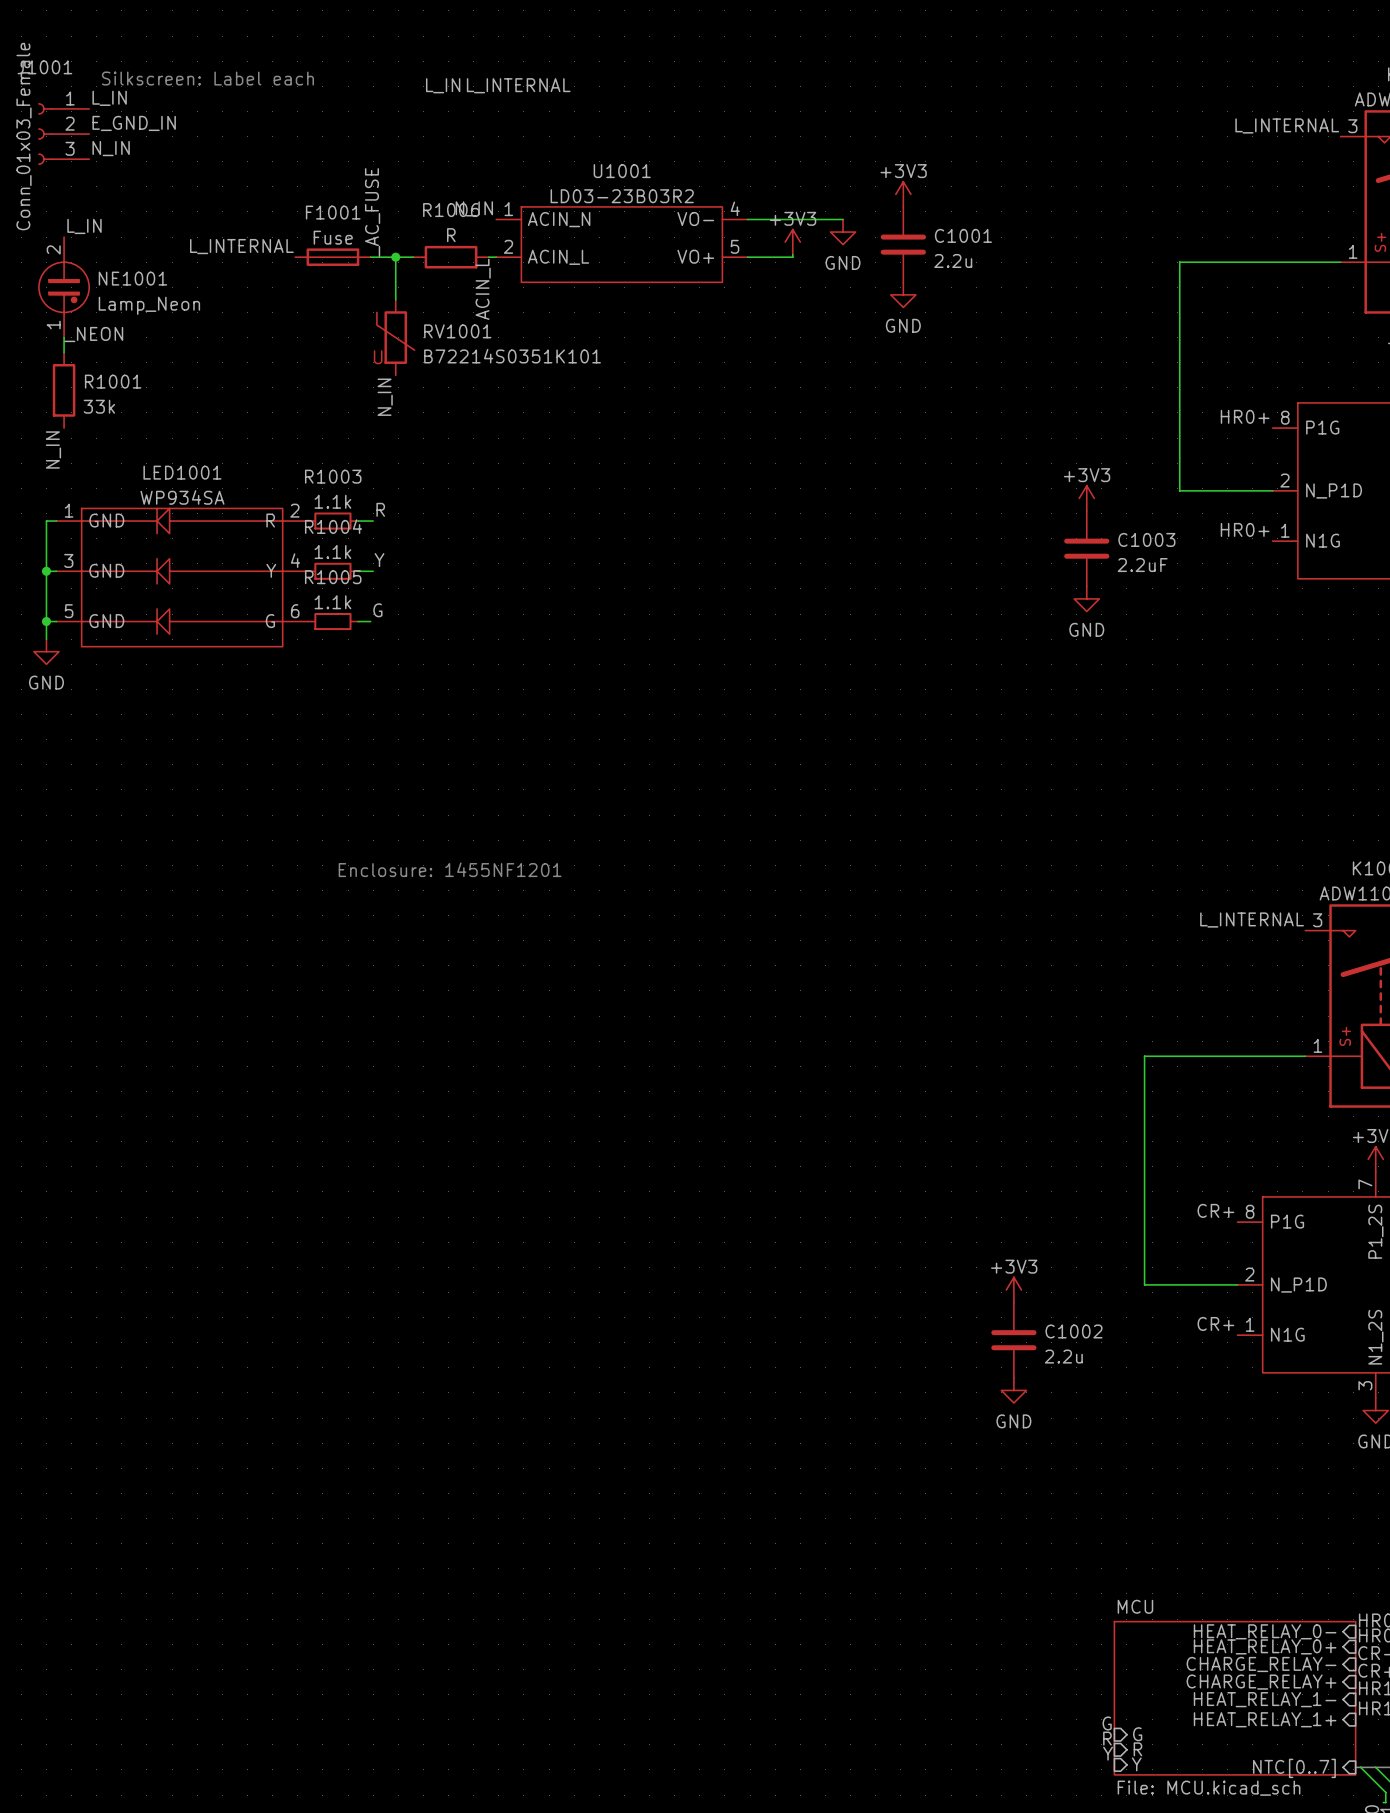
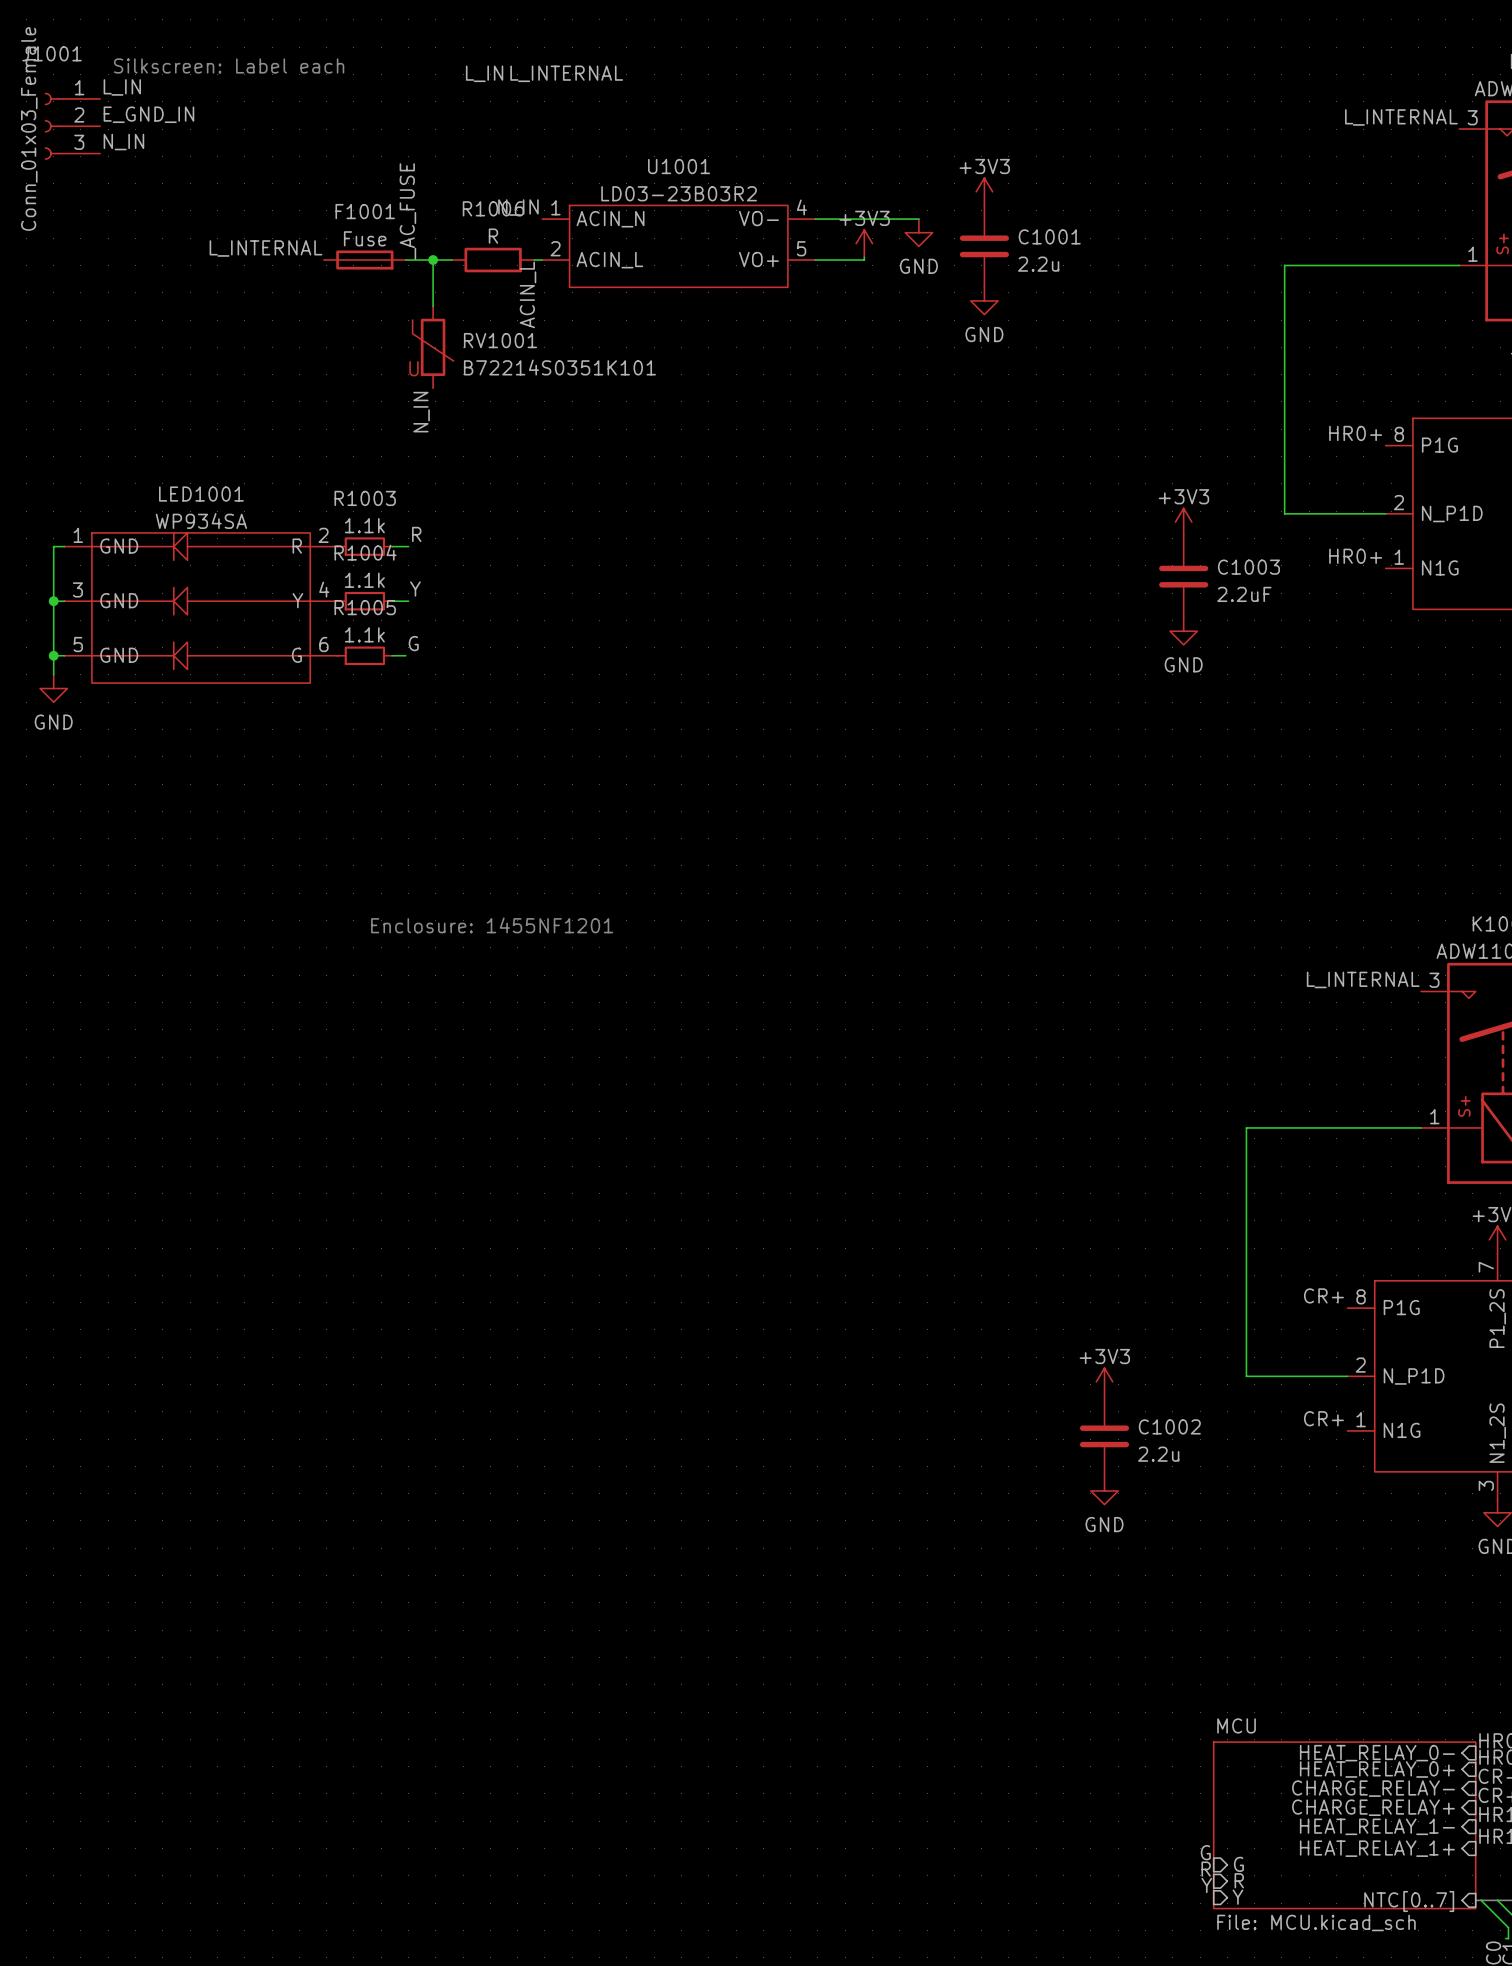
label: L_IN (84, 226) -> none
NE1001: Lamp_Neon (64, 287) -> none
label: _NEON (93, 334) -> none
wire: (64, 337) (64, 352) -> none
R1001: 33k (64, 390) -> none
label: N_IN (53, 449) -> none

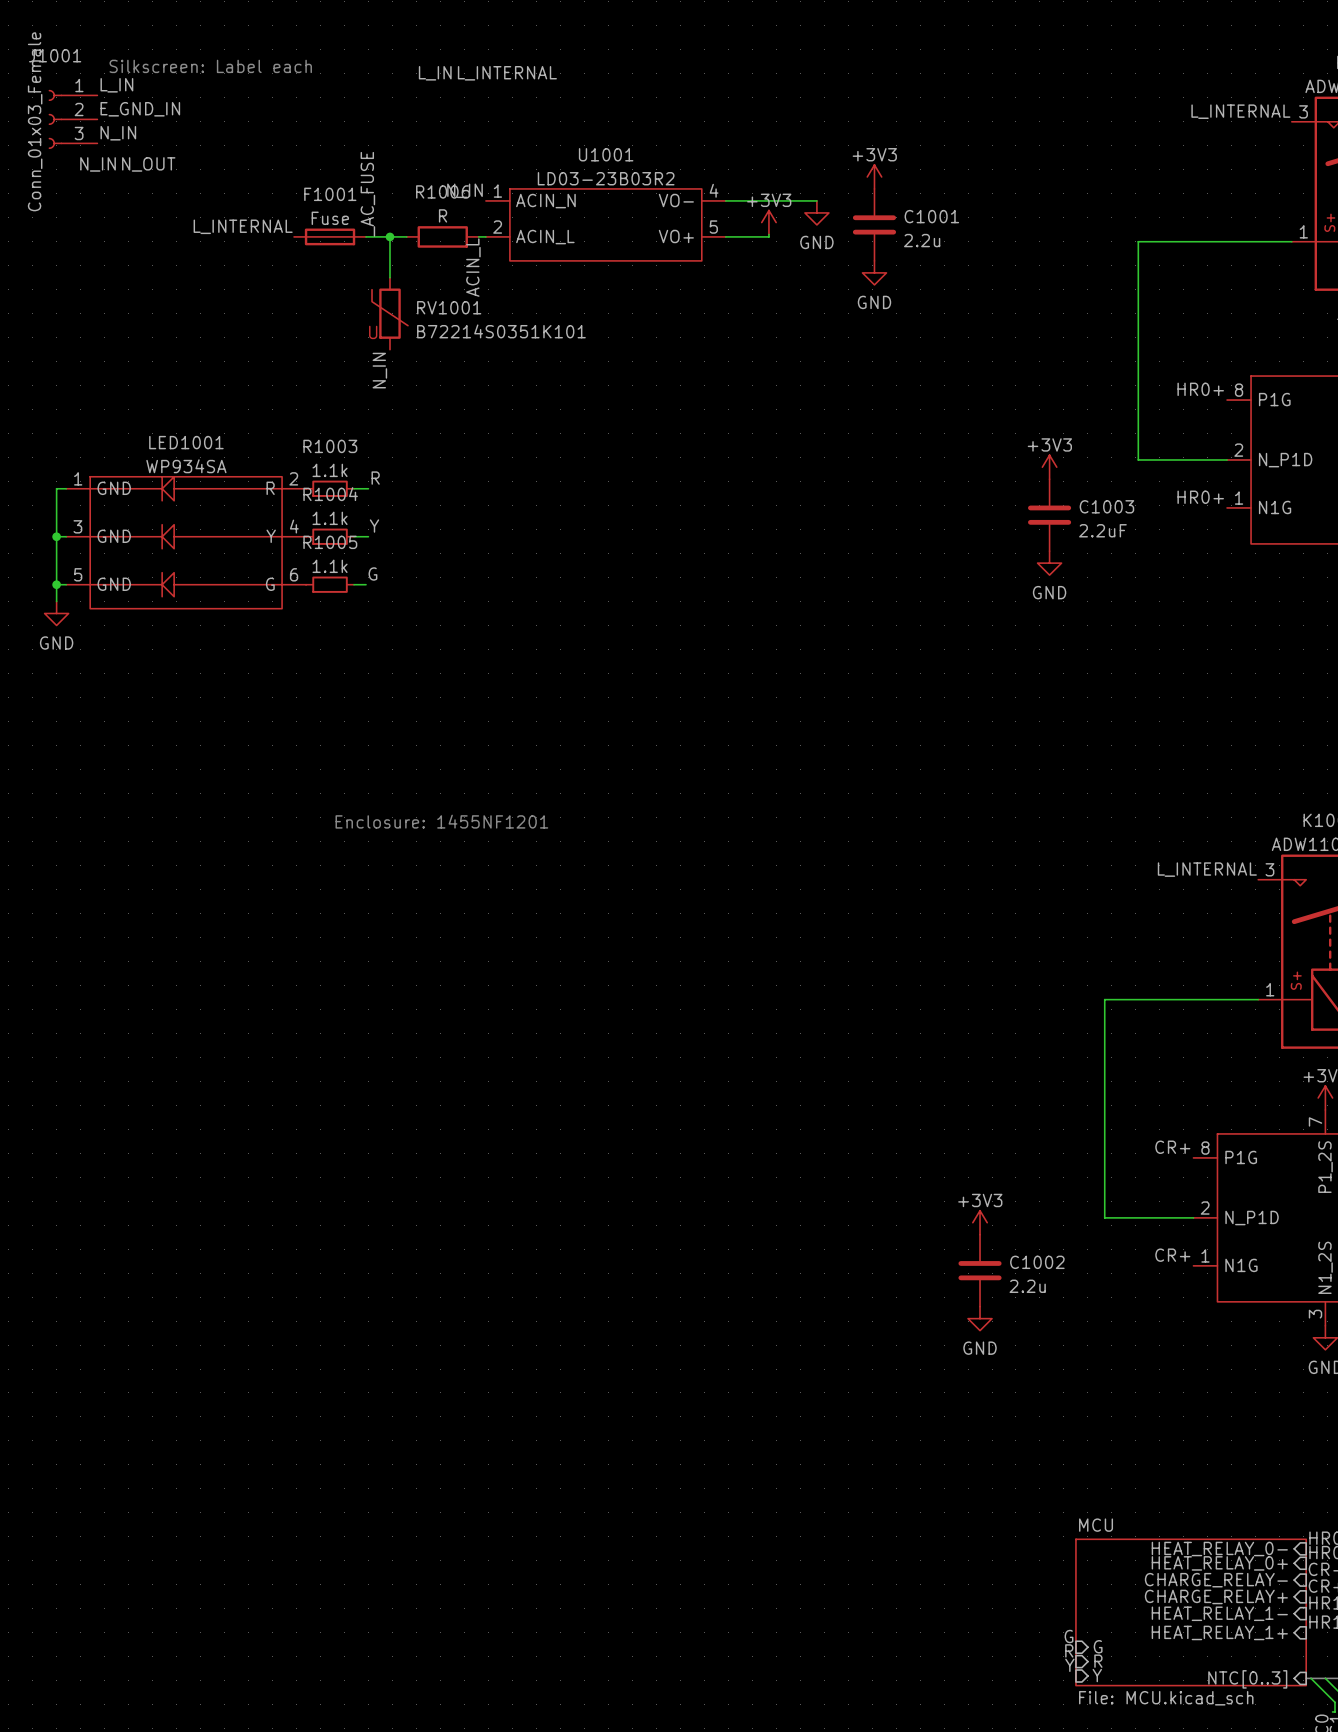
label: none -> N_IN (98, 164)
label: none -> N_OUT (148, 164)
sheet pin: NTC[0..7] (1409, 1901) -> NTC[0..3] (1247, 1679)

